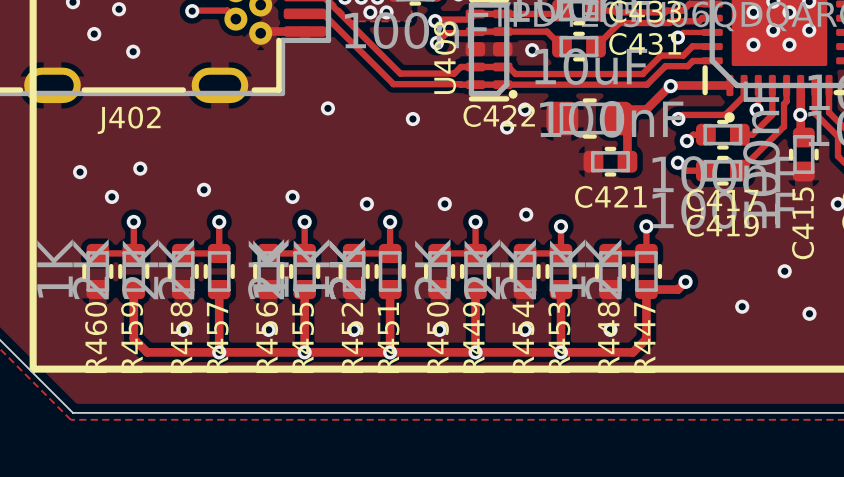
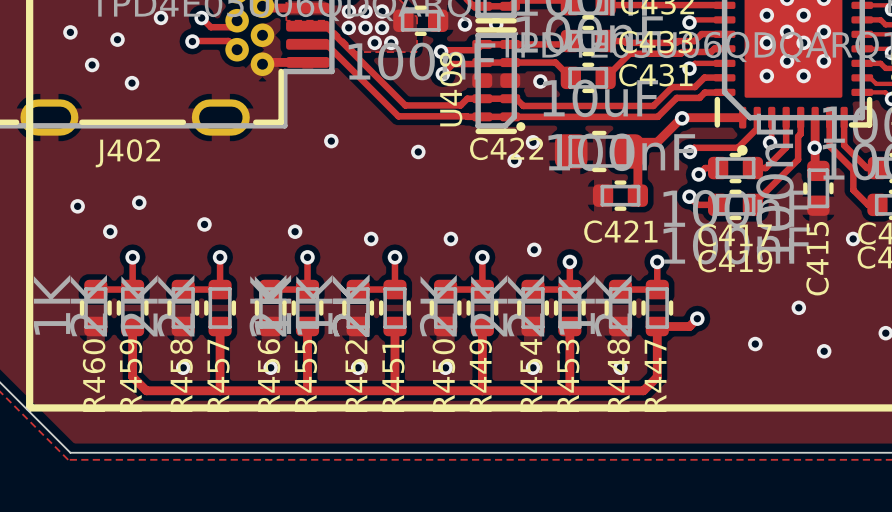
via: (219, 352) -> none
via: (304, 352) -> none
via: (390, 352) -> none
via: (475, 352) -> none
via: (561, 352) -> none

